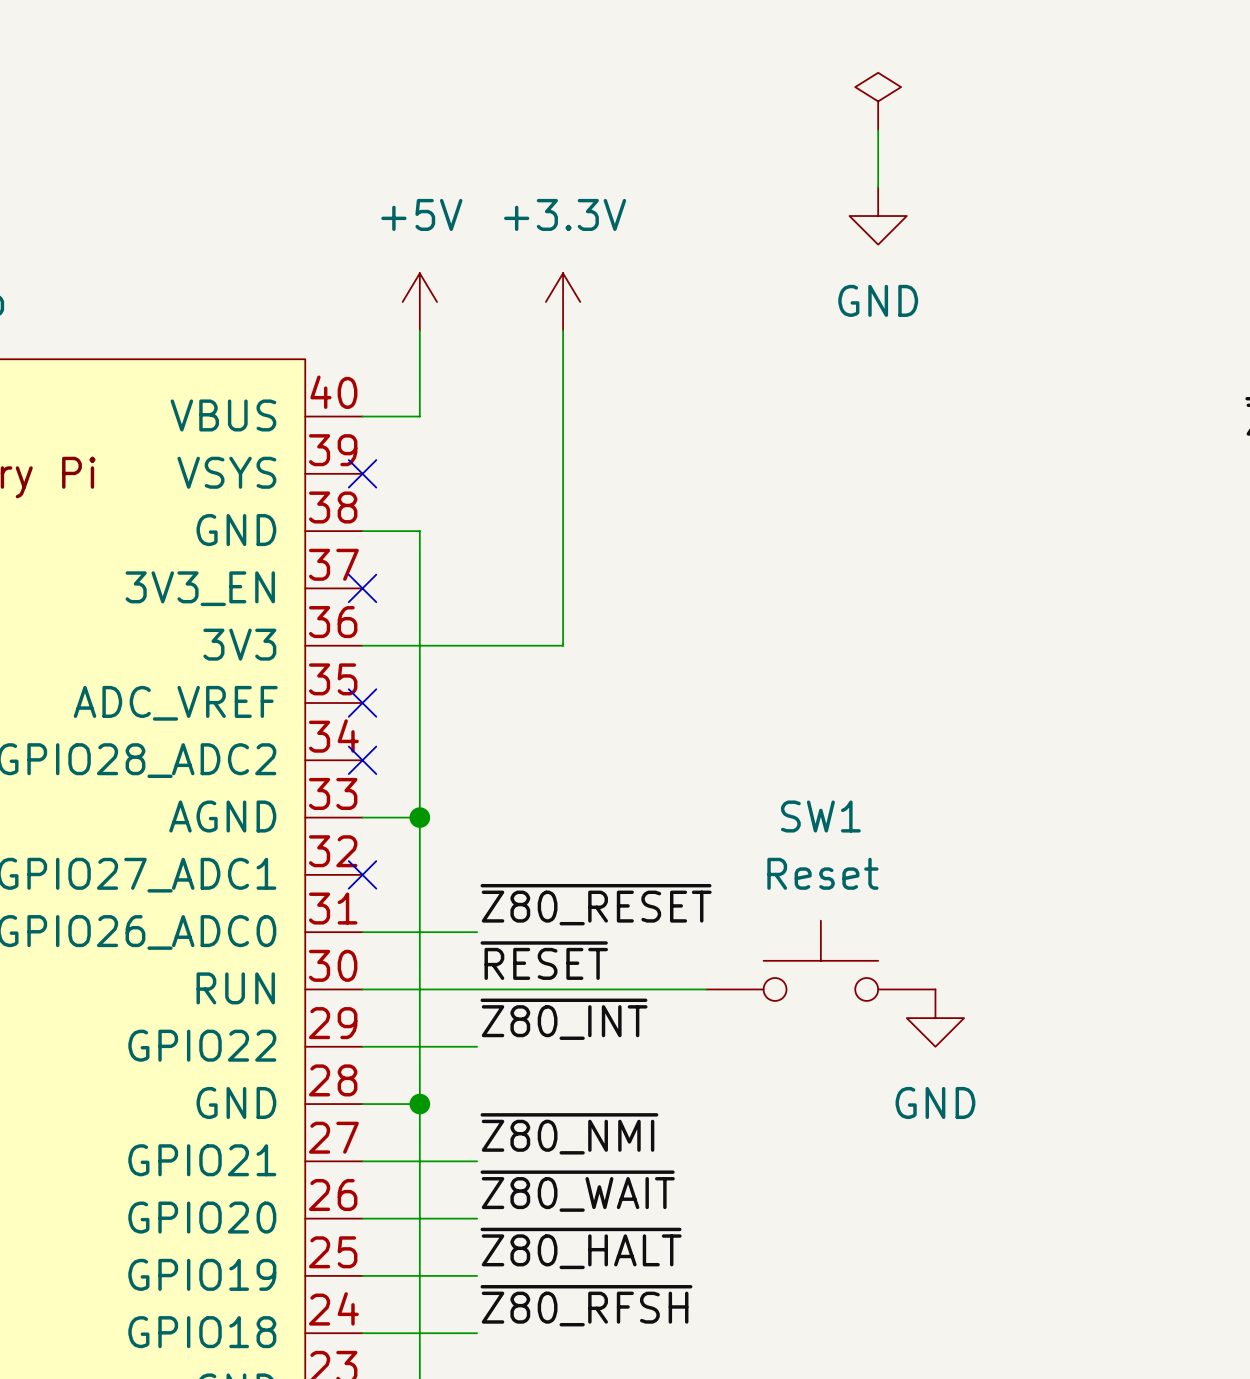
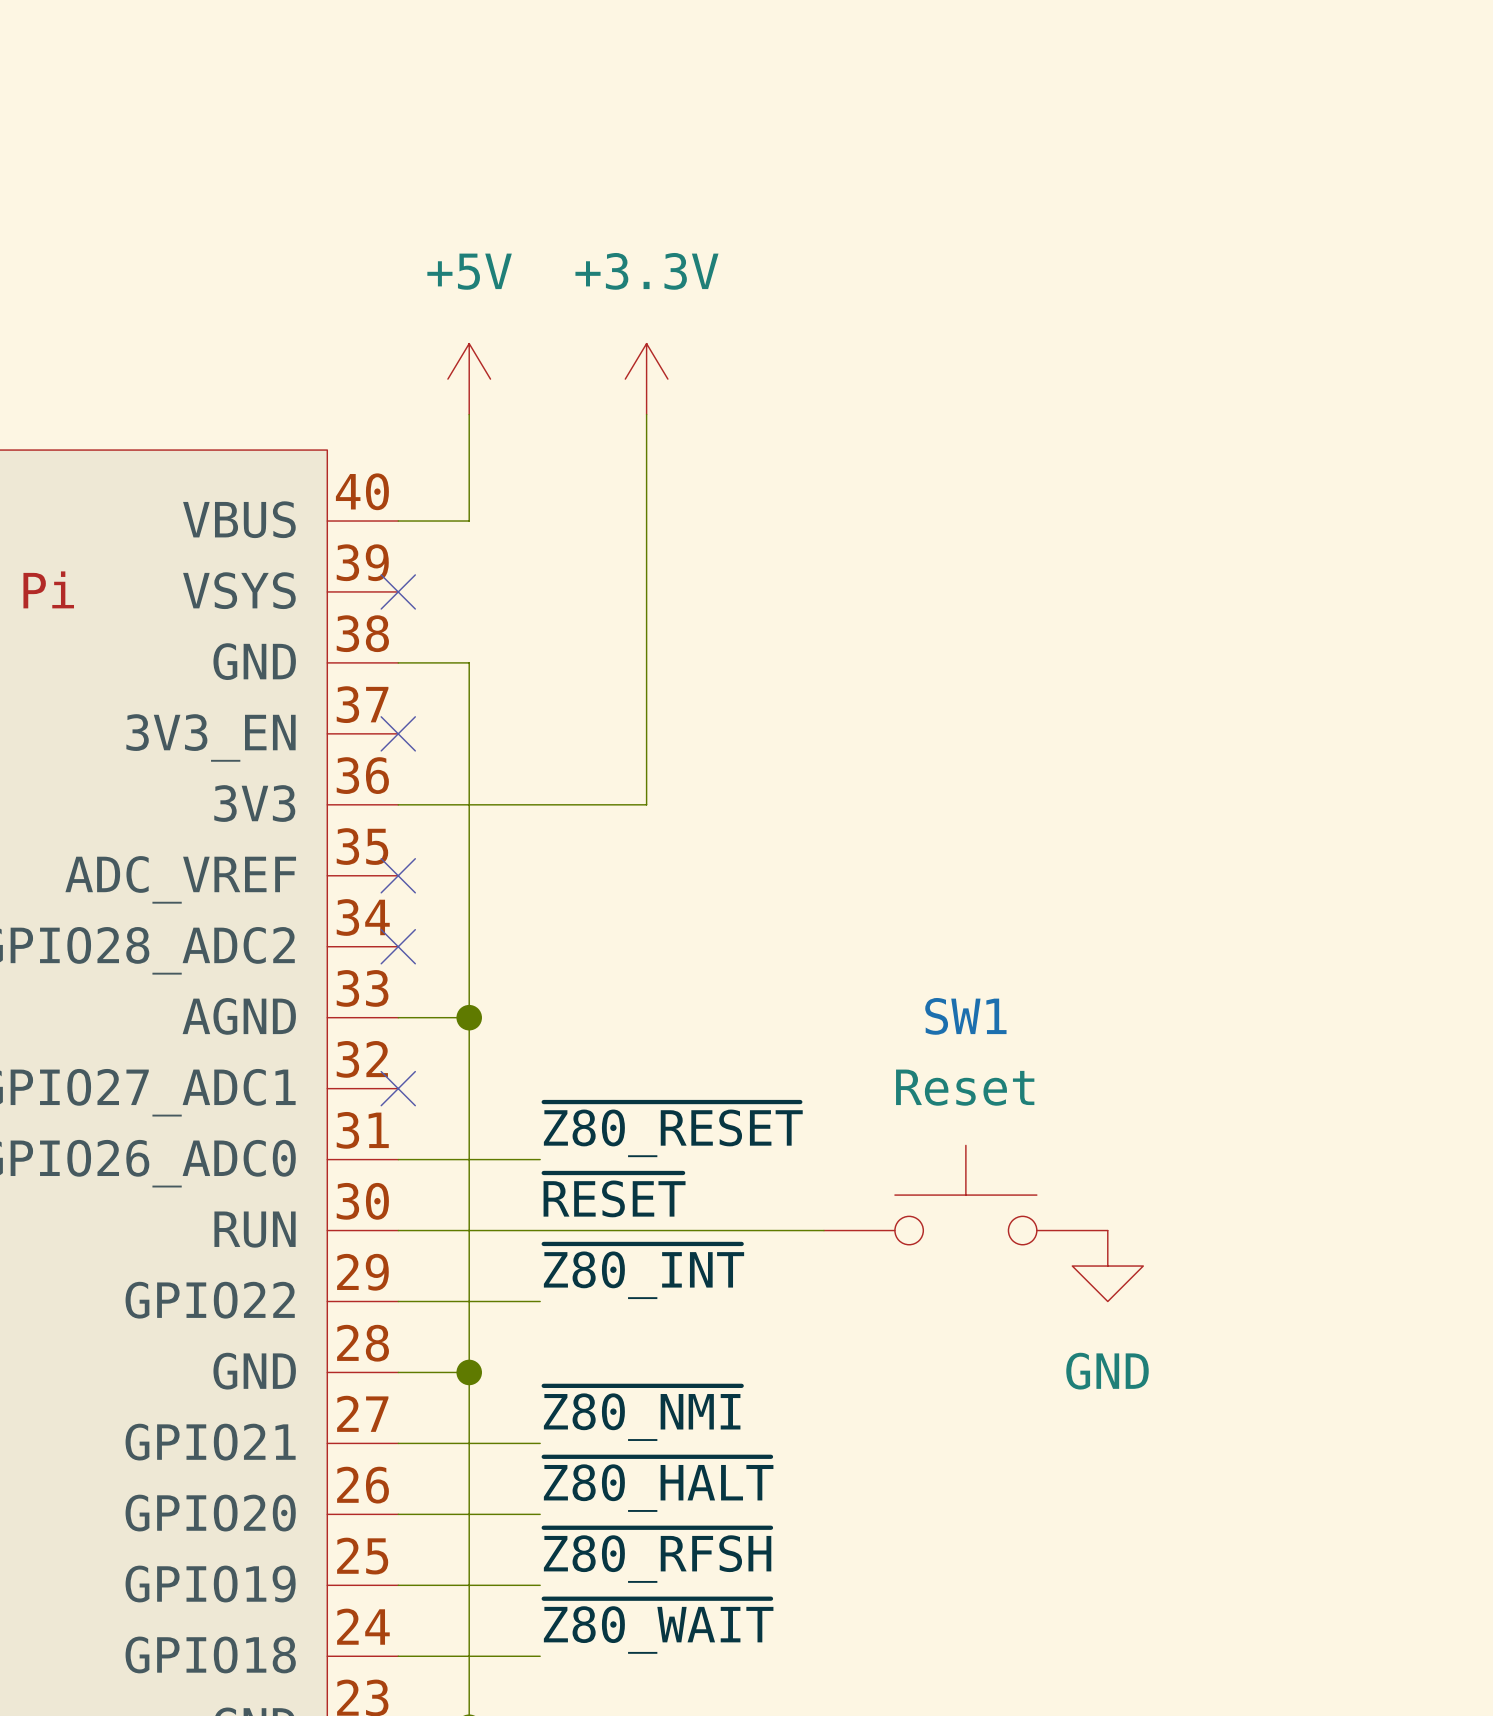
power symbol: (878, 101) -> none
wire: (878, 130) (878, 187) -> none
power symbol: GND (878, 216) -> none
label: ~{Z80_WAIT} (577, 1191) -> ~{Z80_HALT} (658, 1484)
label: ~{Z80_HALT} (581, 1248) -> ~{Z80_RFSH} (657, 1555)
label: ~{Z80_RFSH} (586, 1305) -> ~{Z80_WAIT} (658, 1626)

